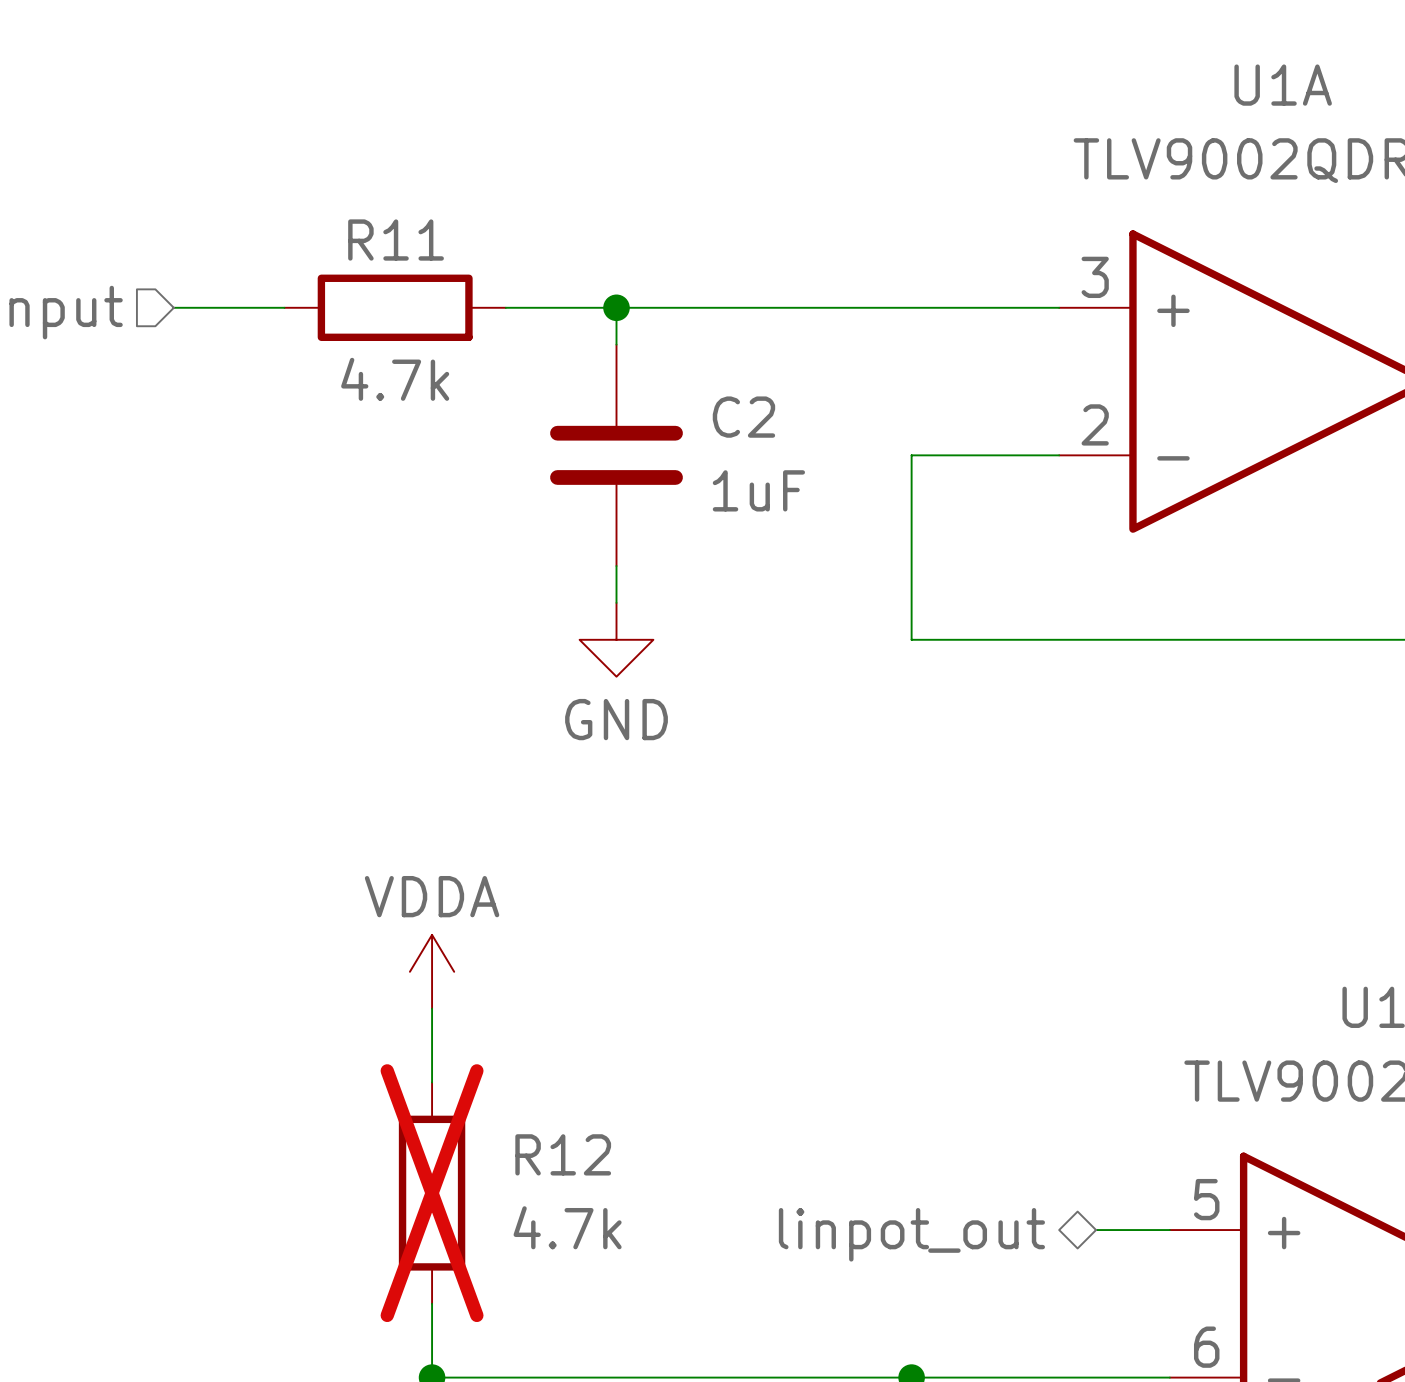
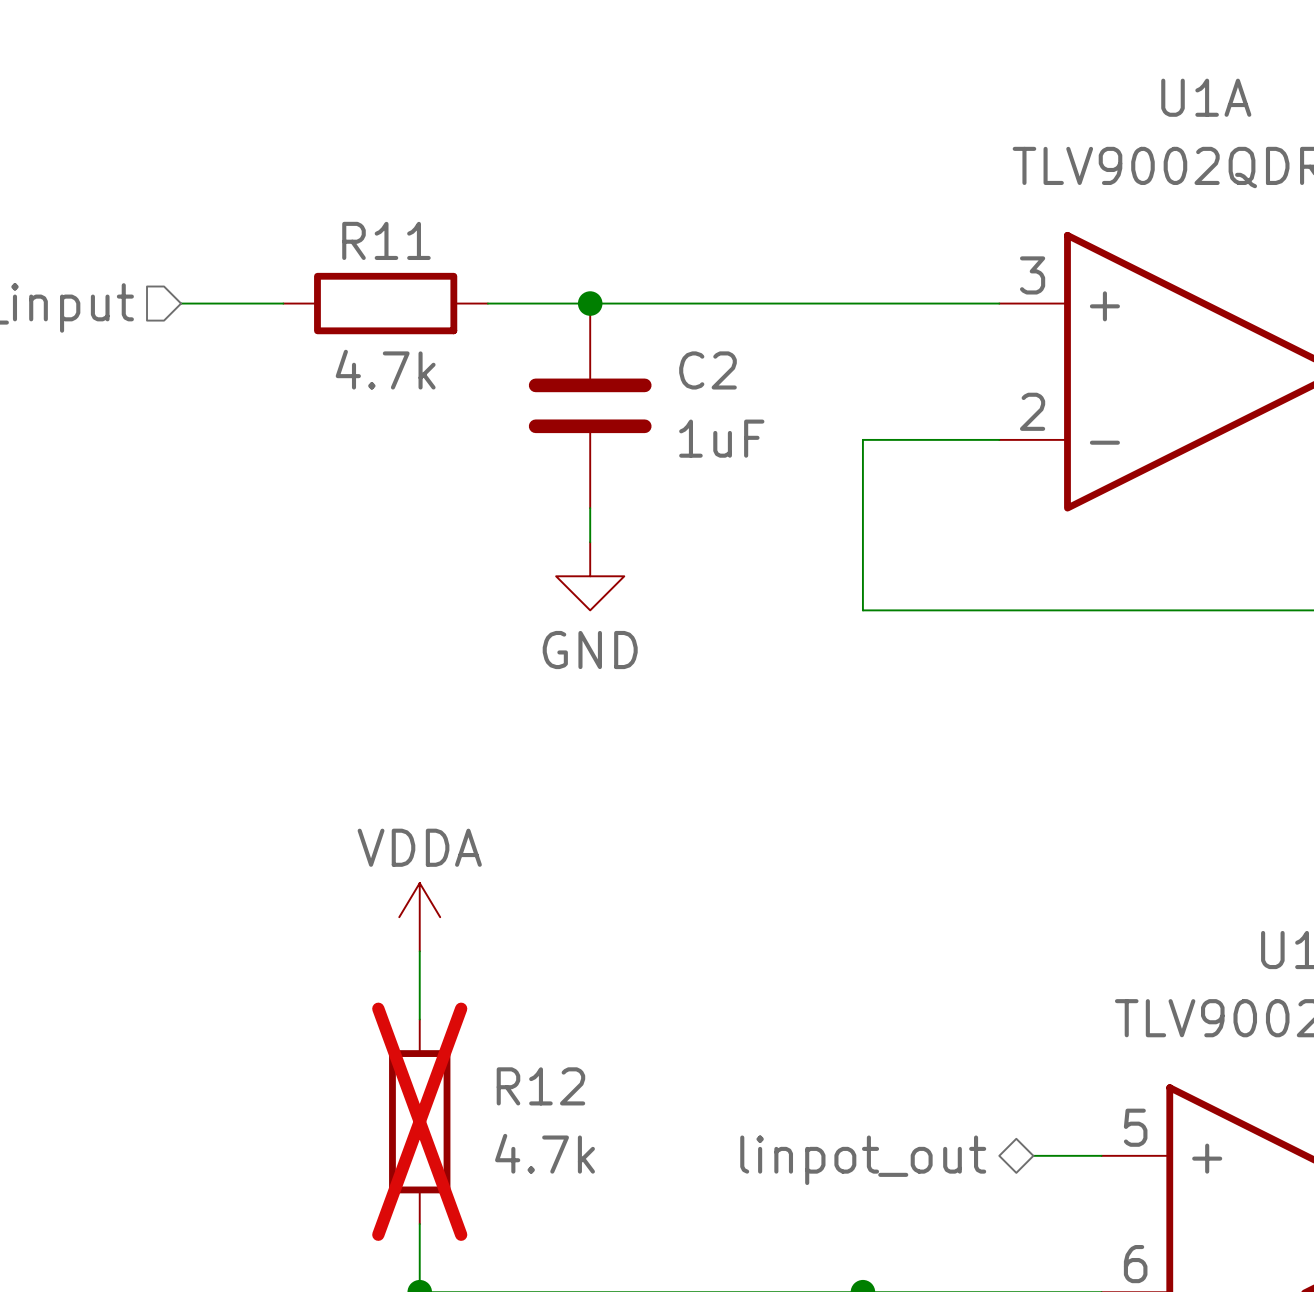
C2 position: (616, 455) -> (590, 405)
power symbol position: GND (616, 639) -> GND (590, 576)

